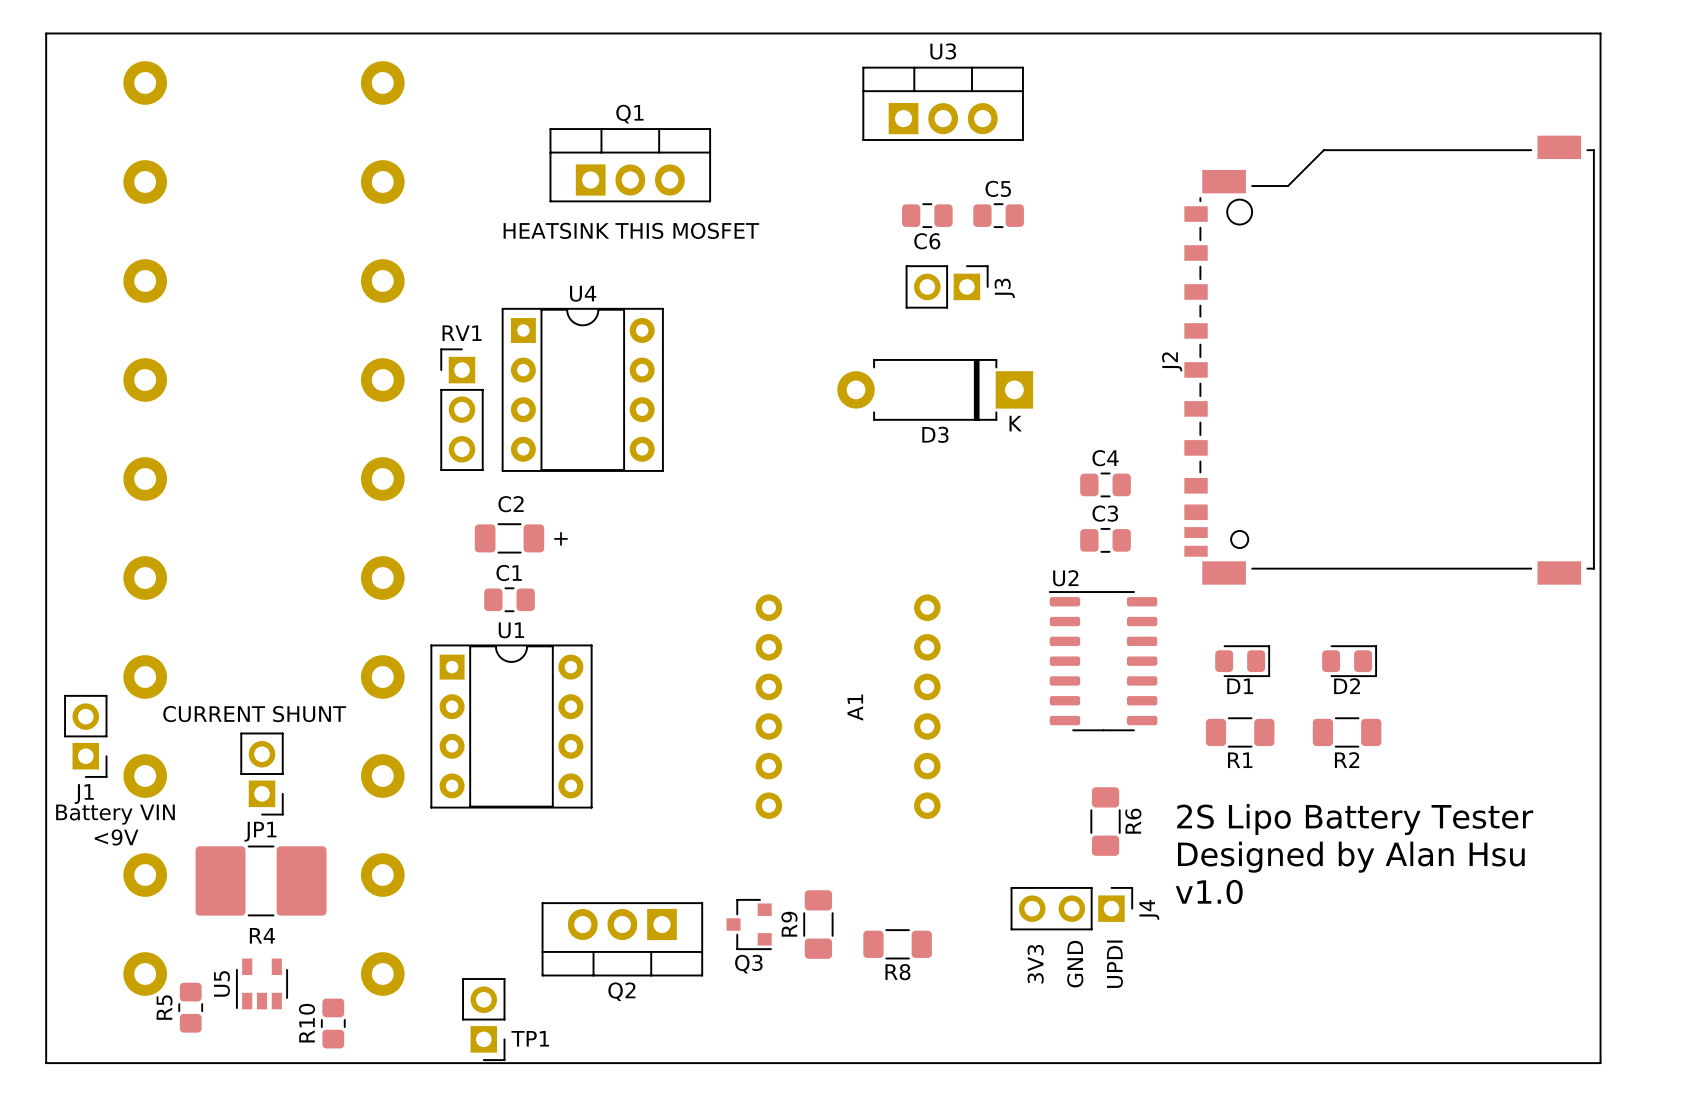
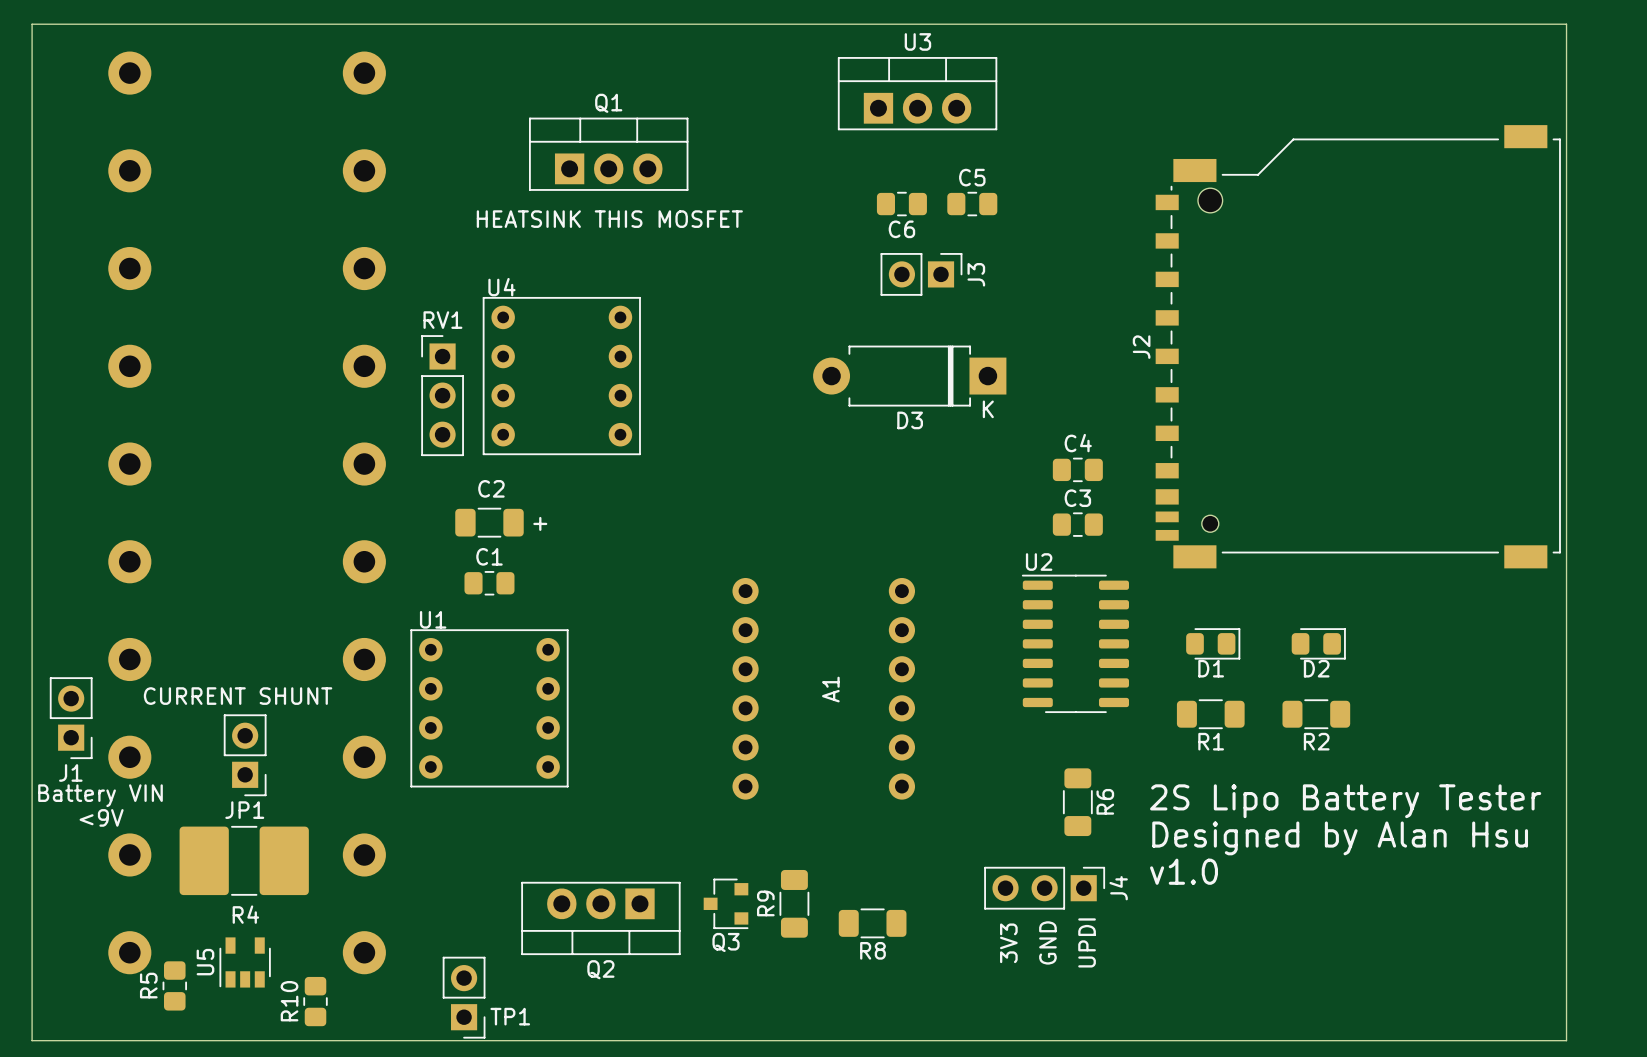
U4 name position: U4 (583, 293) -> U4 (501, 287)
U4 footprint: [501, 307, 664, 472] -> [482, 296, 641, 456]
U1 name position: U1 (511, 630) -> U1 (433, 619)
U1 footprint: [430, 644, 593, 809] -> [410, 629, 569, 788]

